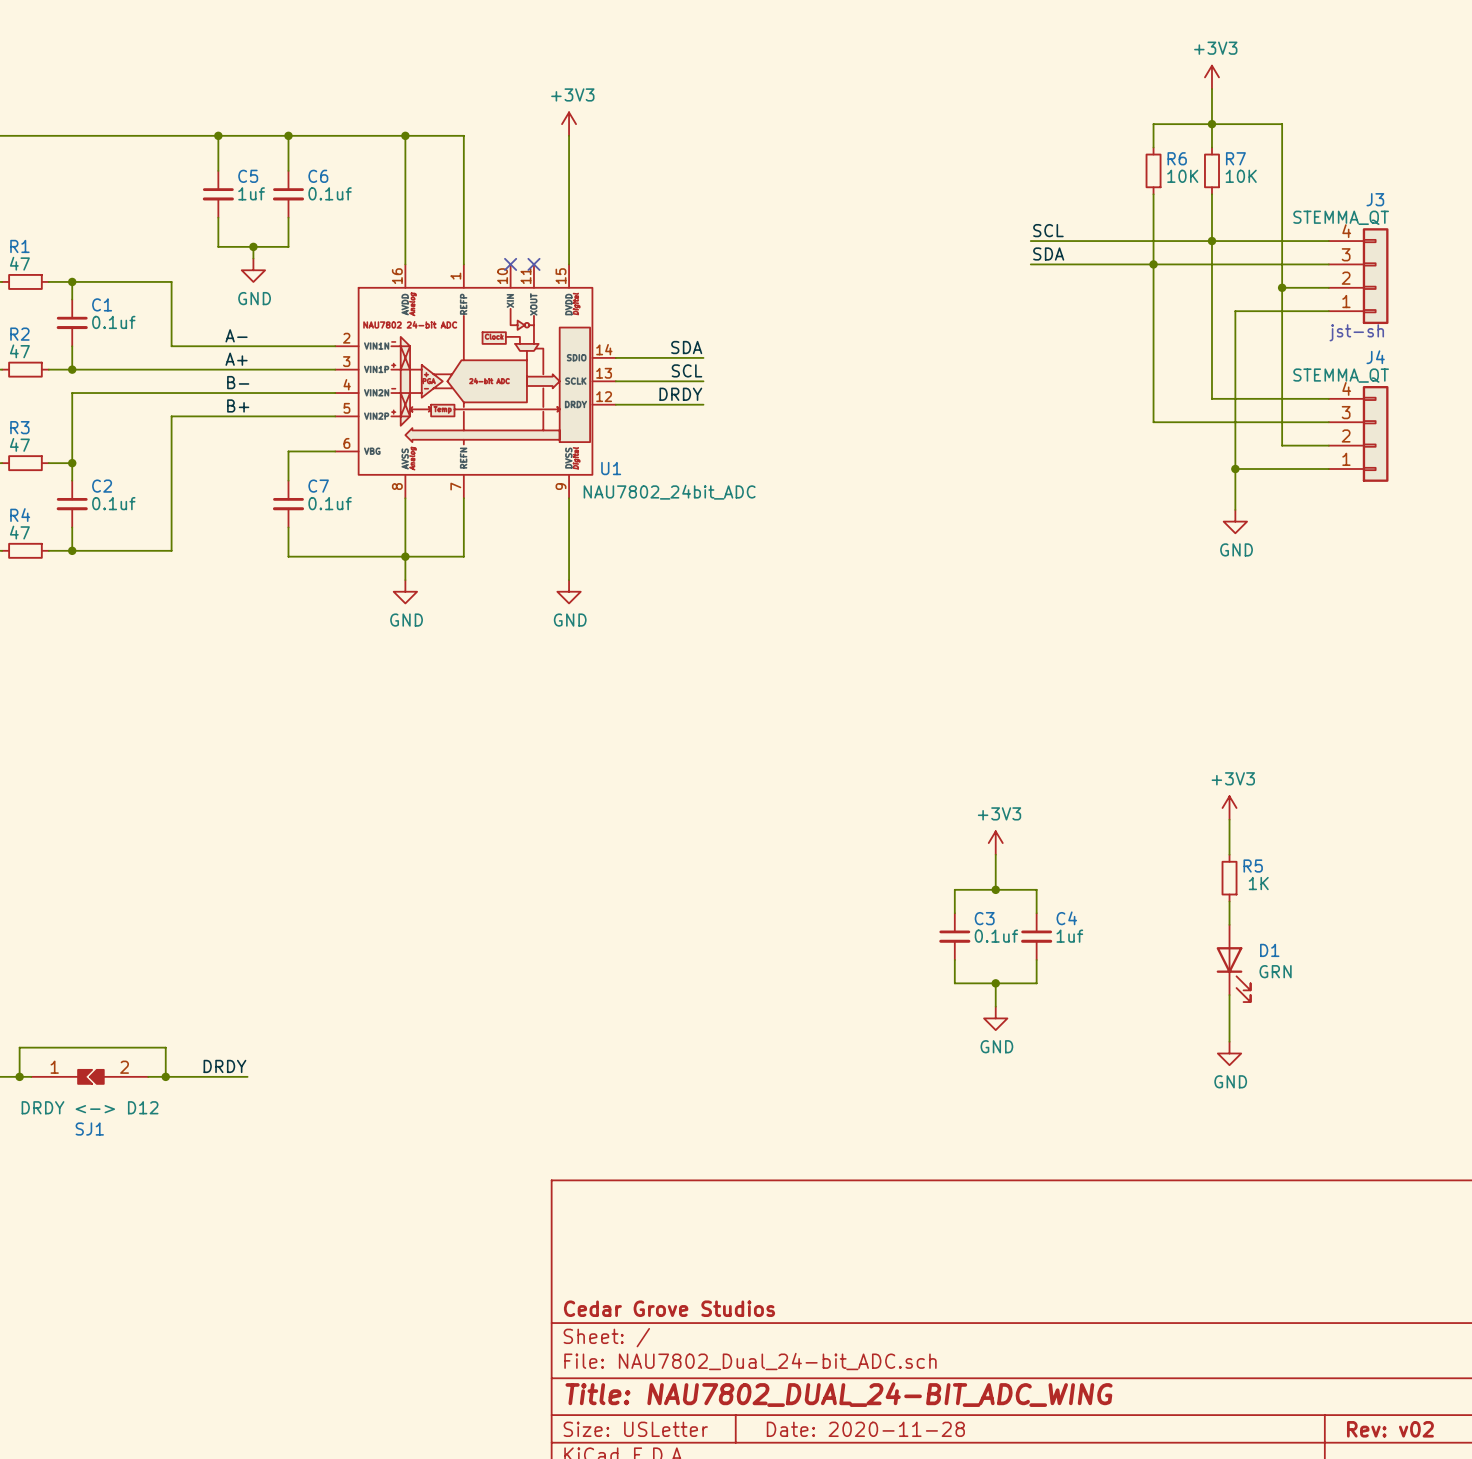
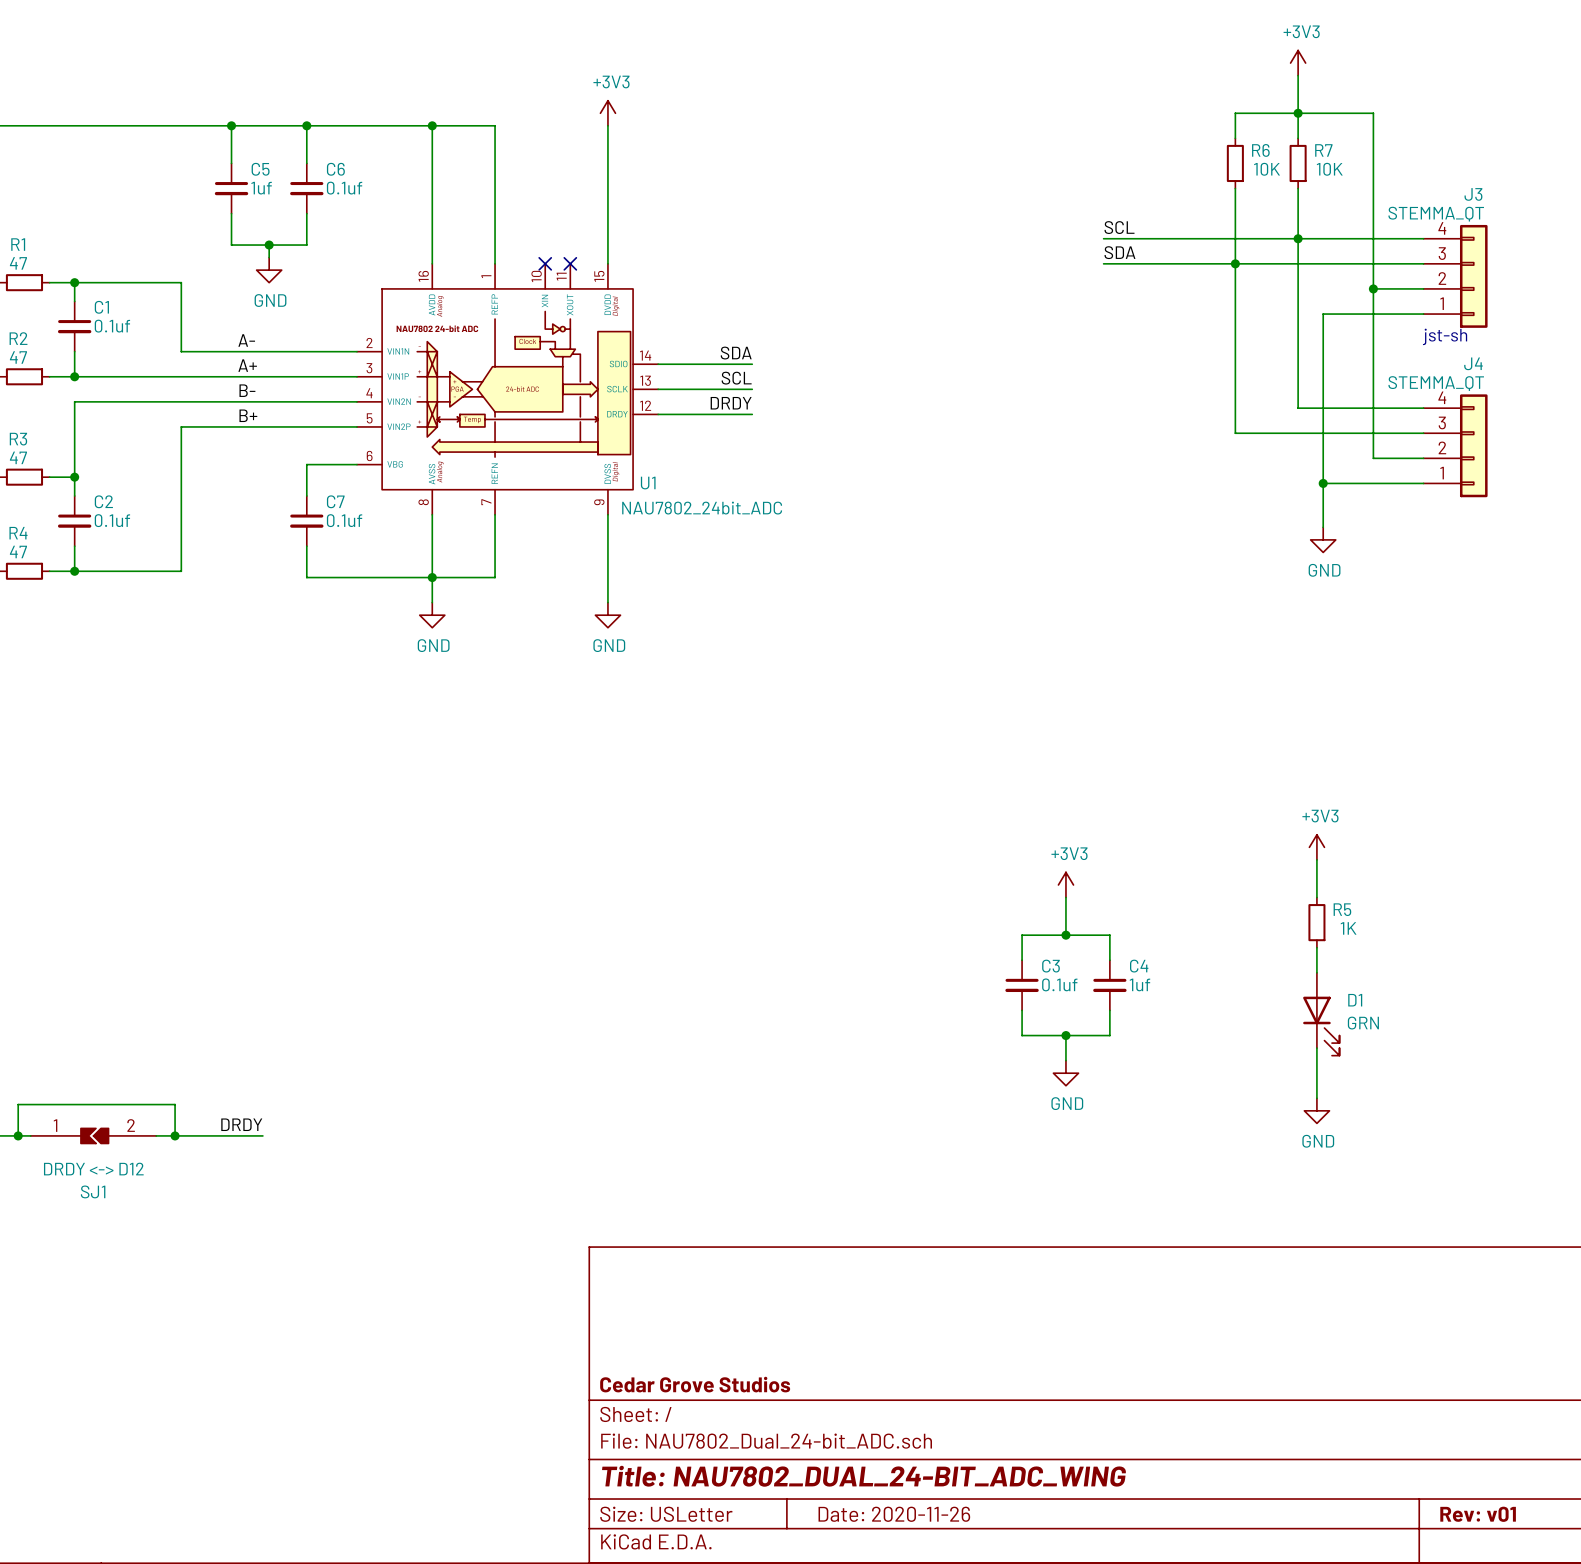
title block: Date: 2020-11-28 (865, 1429) -> Date: 2020-11-26 (894, 1514)
title block: Rev: v02 (1390, 1429) -> Rev: v01 (1478, 1514)

